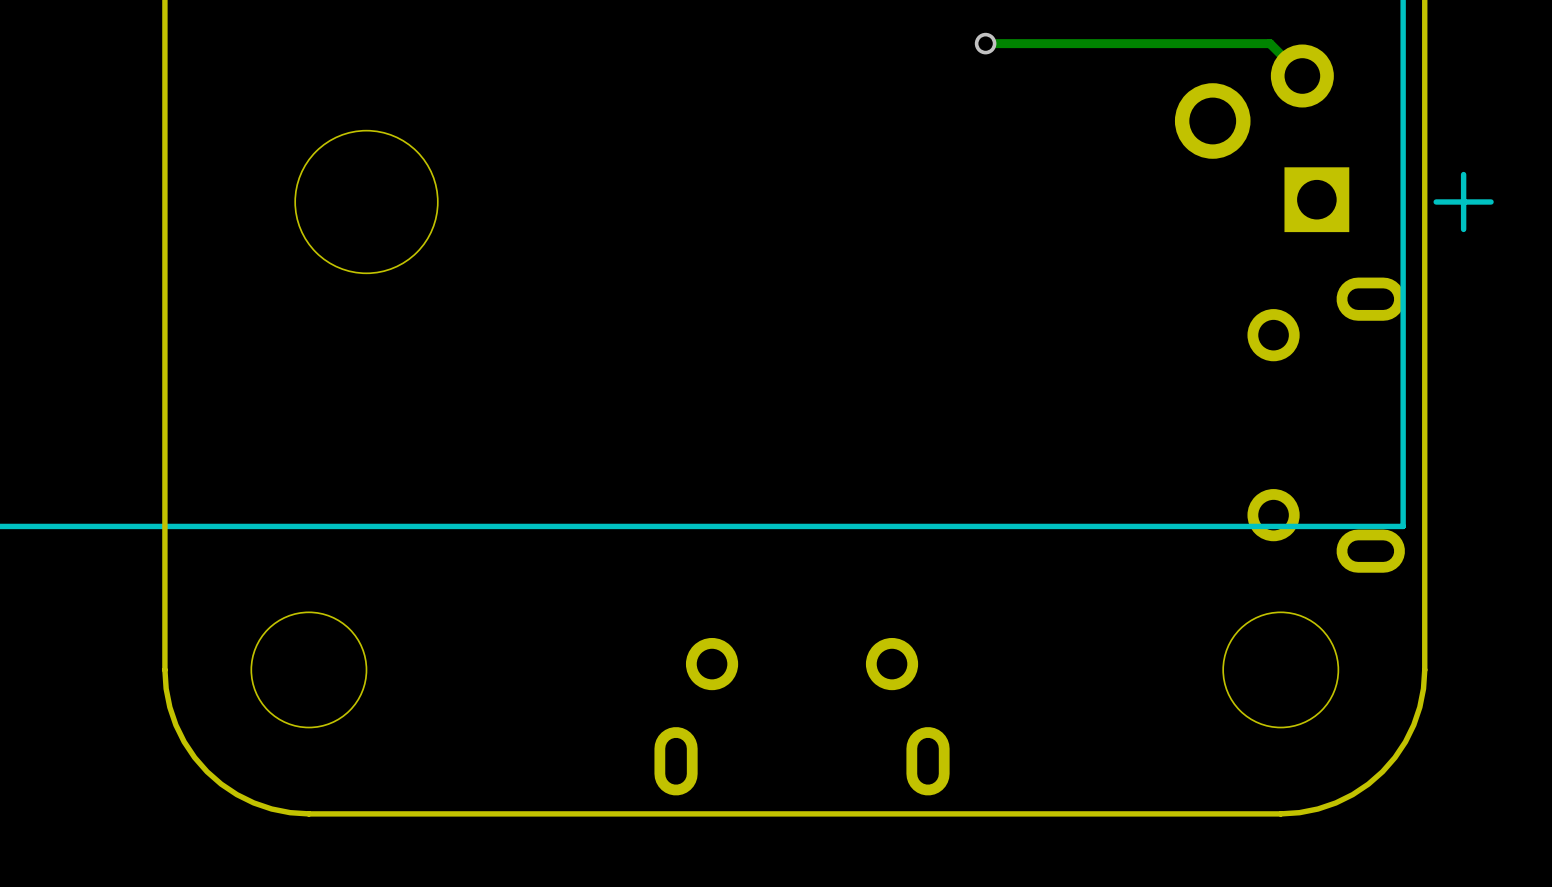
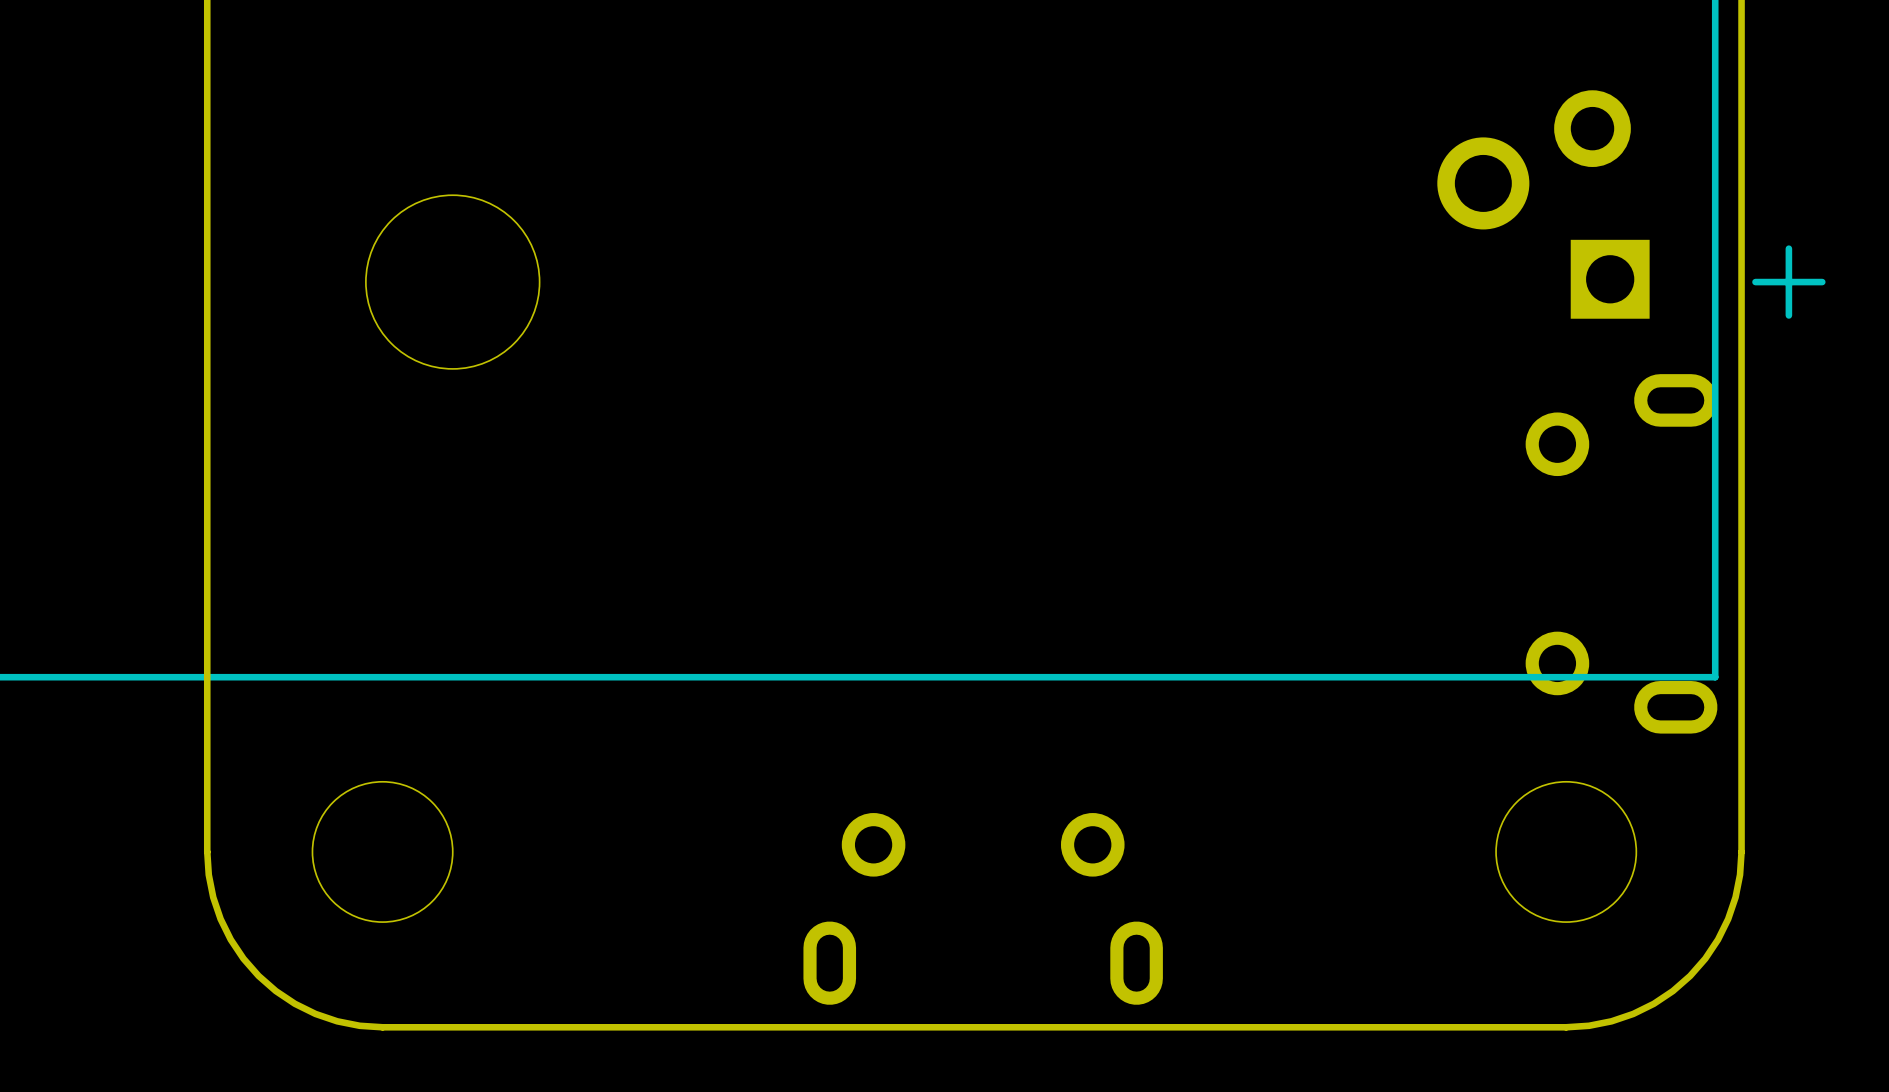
track: (985, 43) (1269, 43) (1302, 76) -> none
via: (985, 43) -> none

